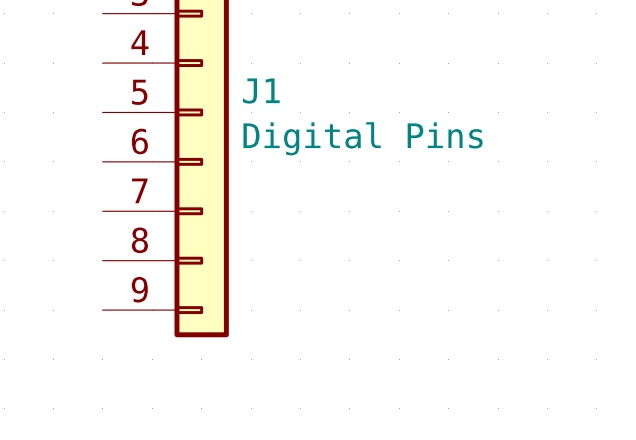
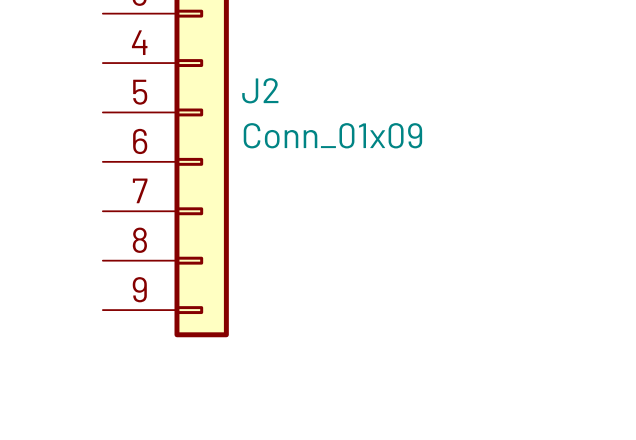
J1 name: J1 (261, 91) -> J2 (260, 90)
J1 value: Digital Pins (363, 138) -> Conn_01x09 (332, 135)

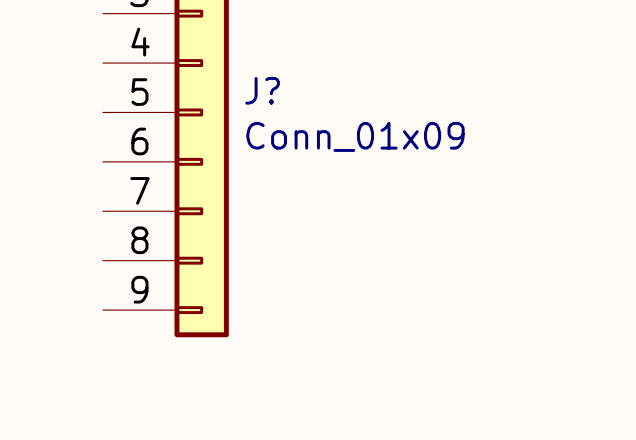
J2 name: J2 (260, 90) -> J? (262, 90)

